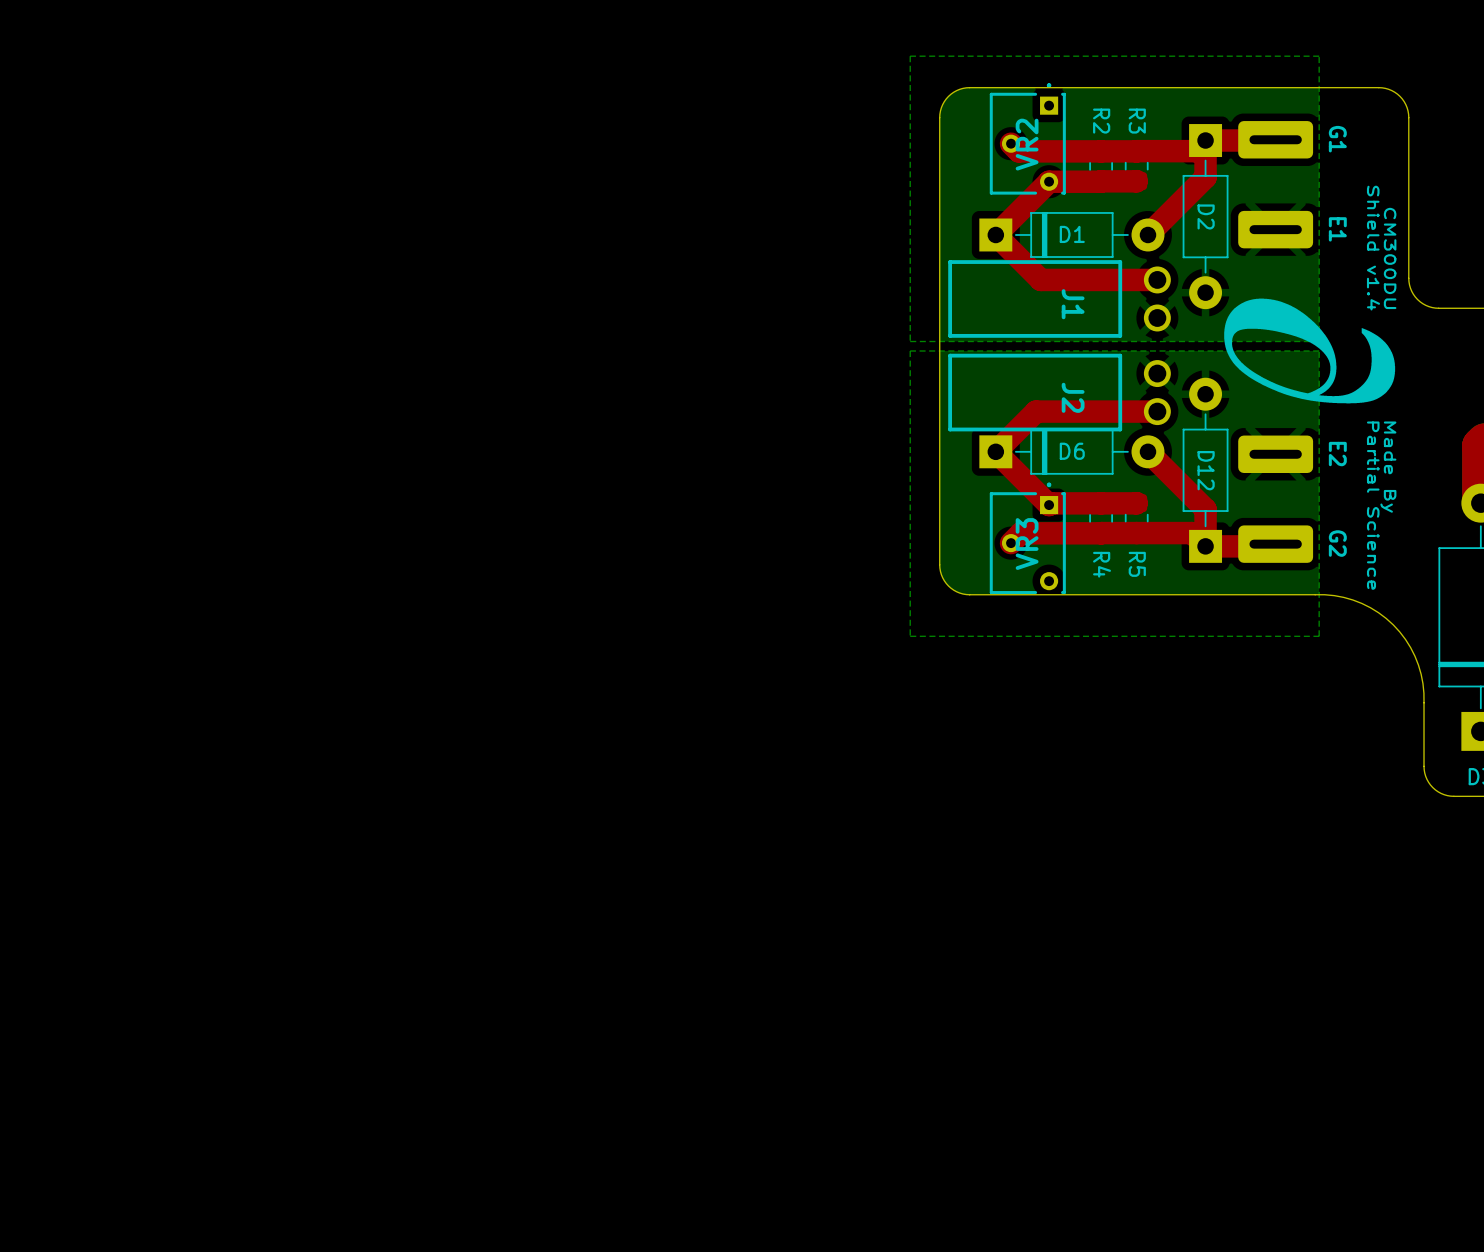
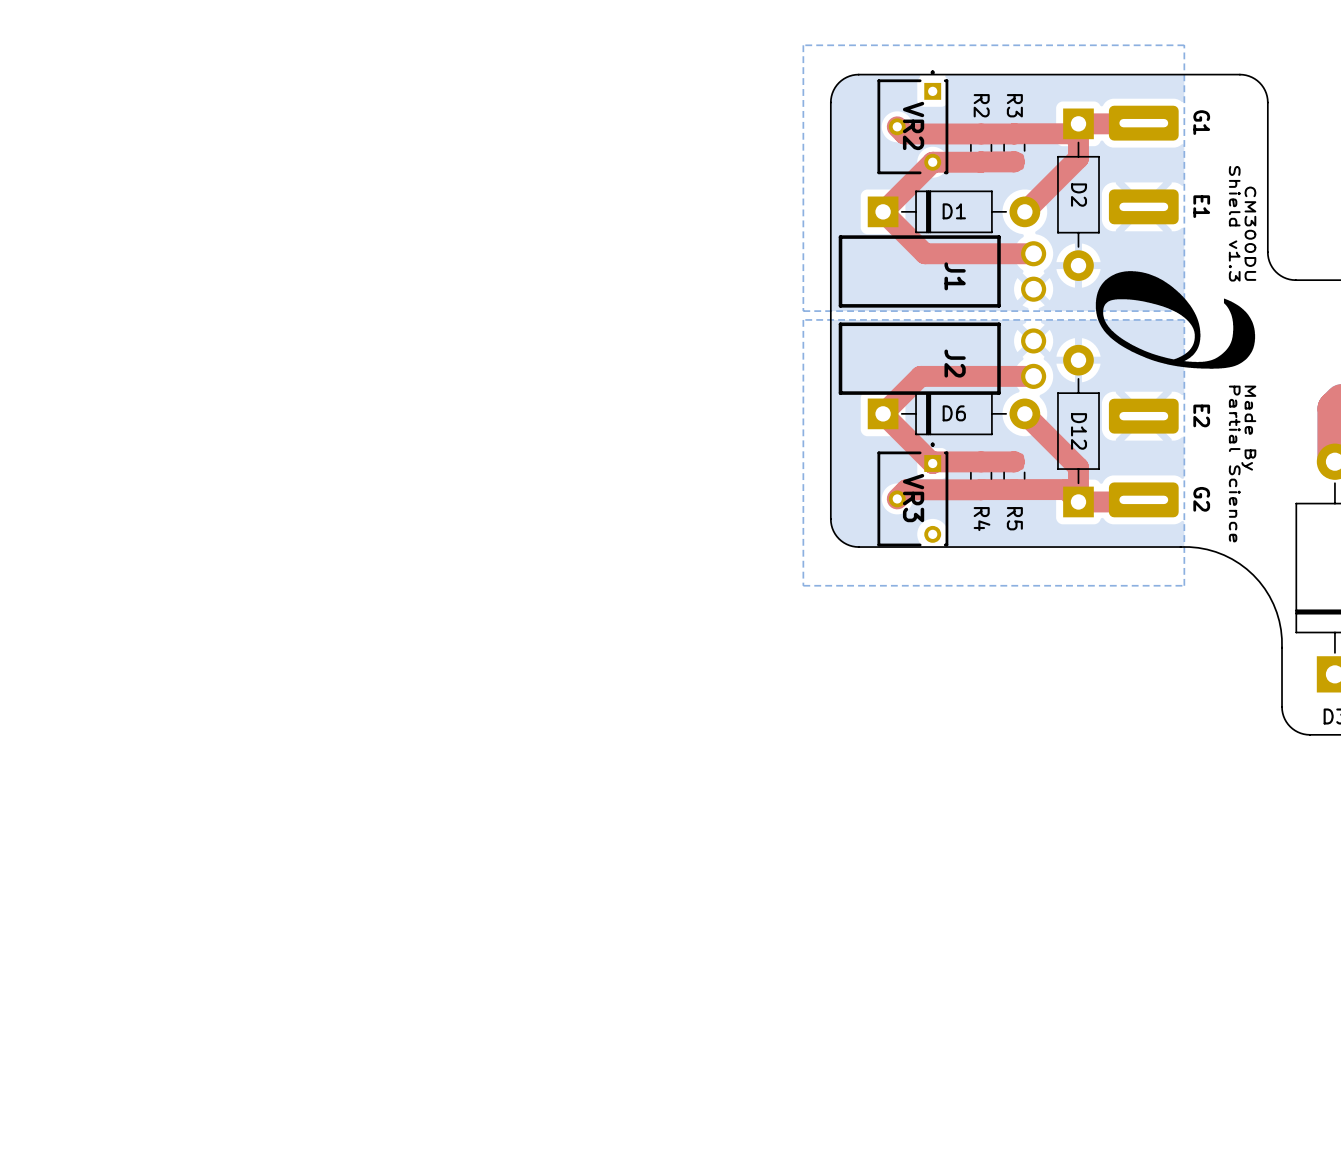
VR2 name rotation: 0° (1027, 144) -> 180° (913, 125)
text: Shield v1.4 (1373, 248) -> Shield v1.3 (1234, 223)
VR3 name rotation: 0° (1027, 544) -> 180° (913, 498)

